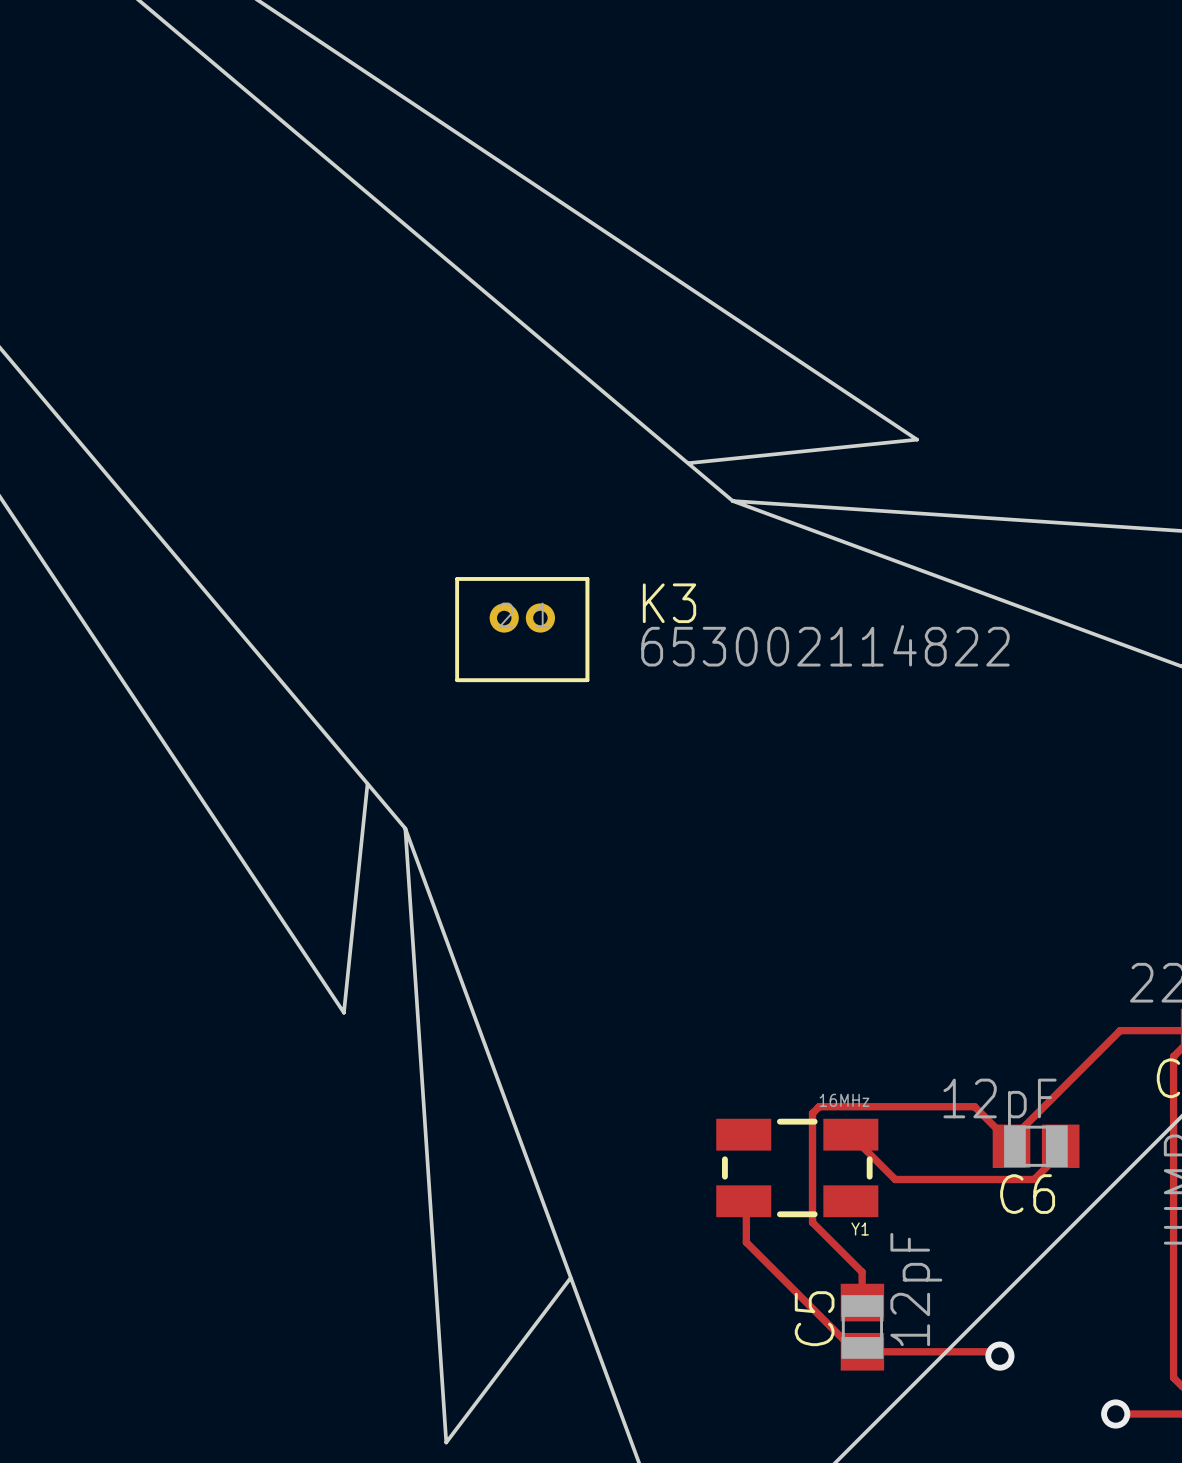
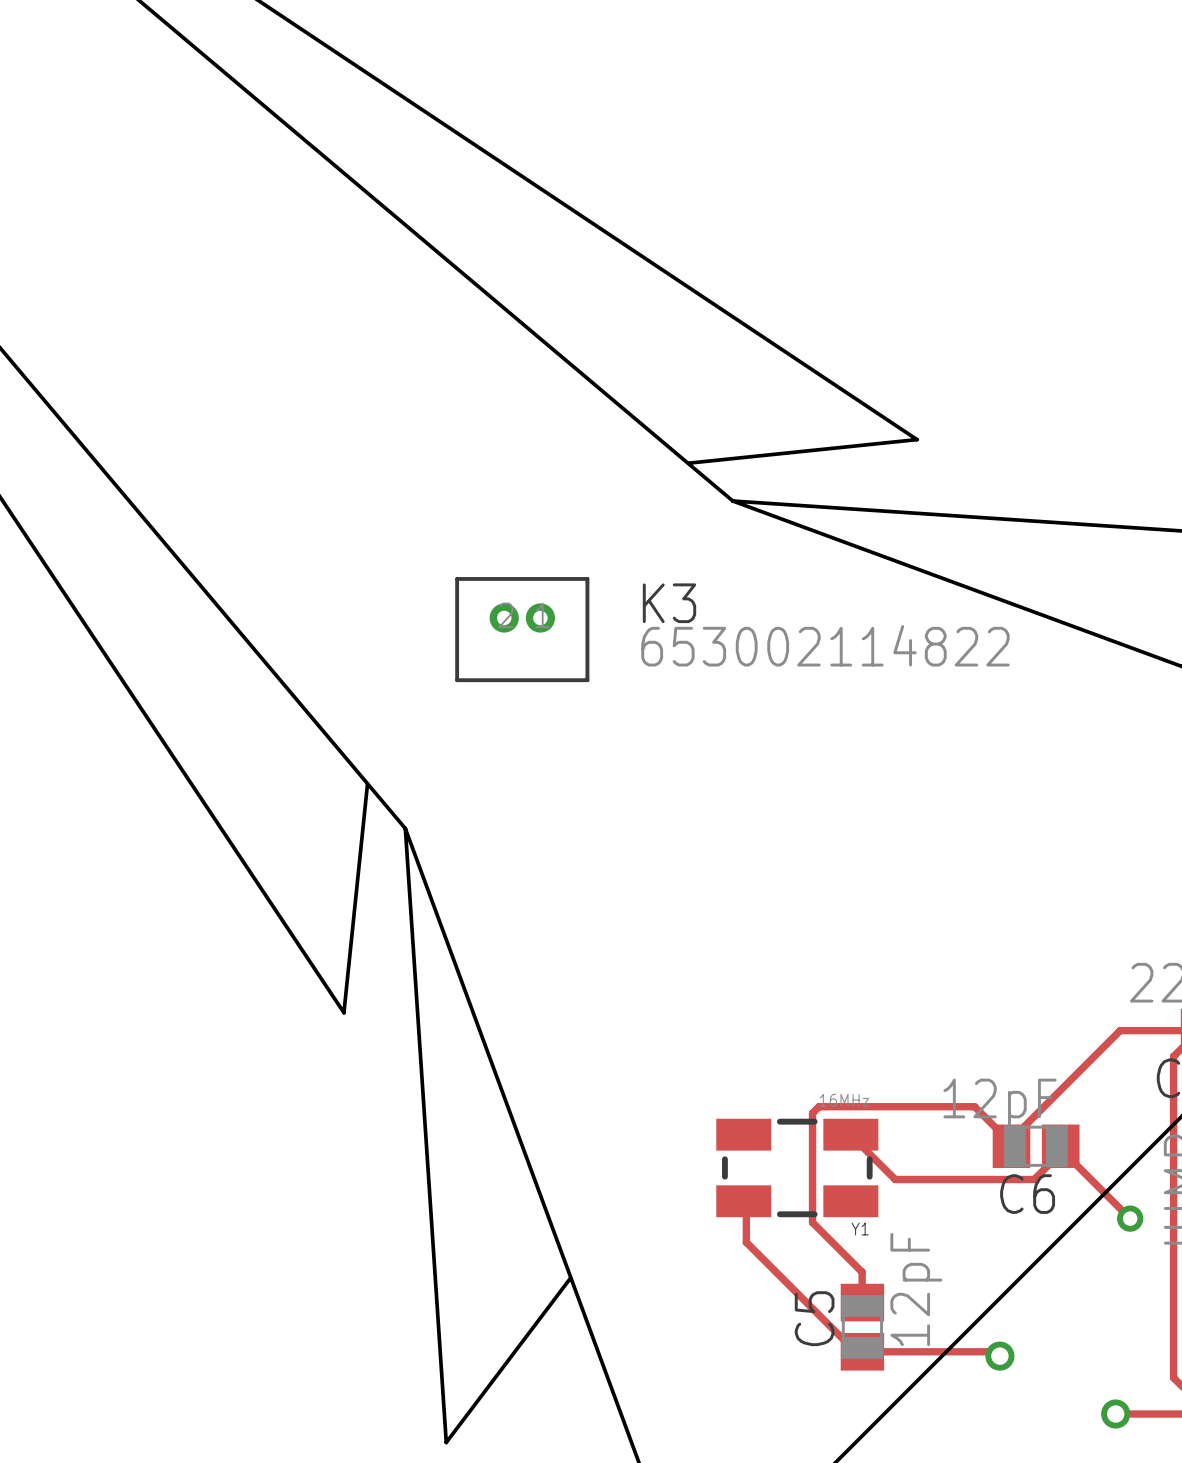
track: none -> (1060, 1149) (1130, 1218)
via: none -> (1130, 1218)

